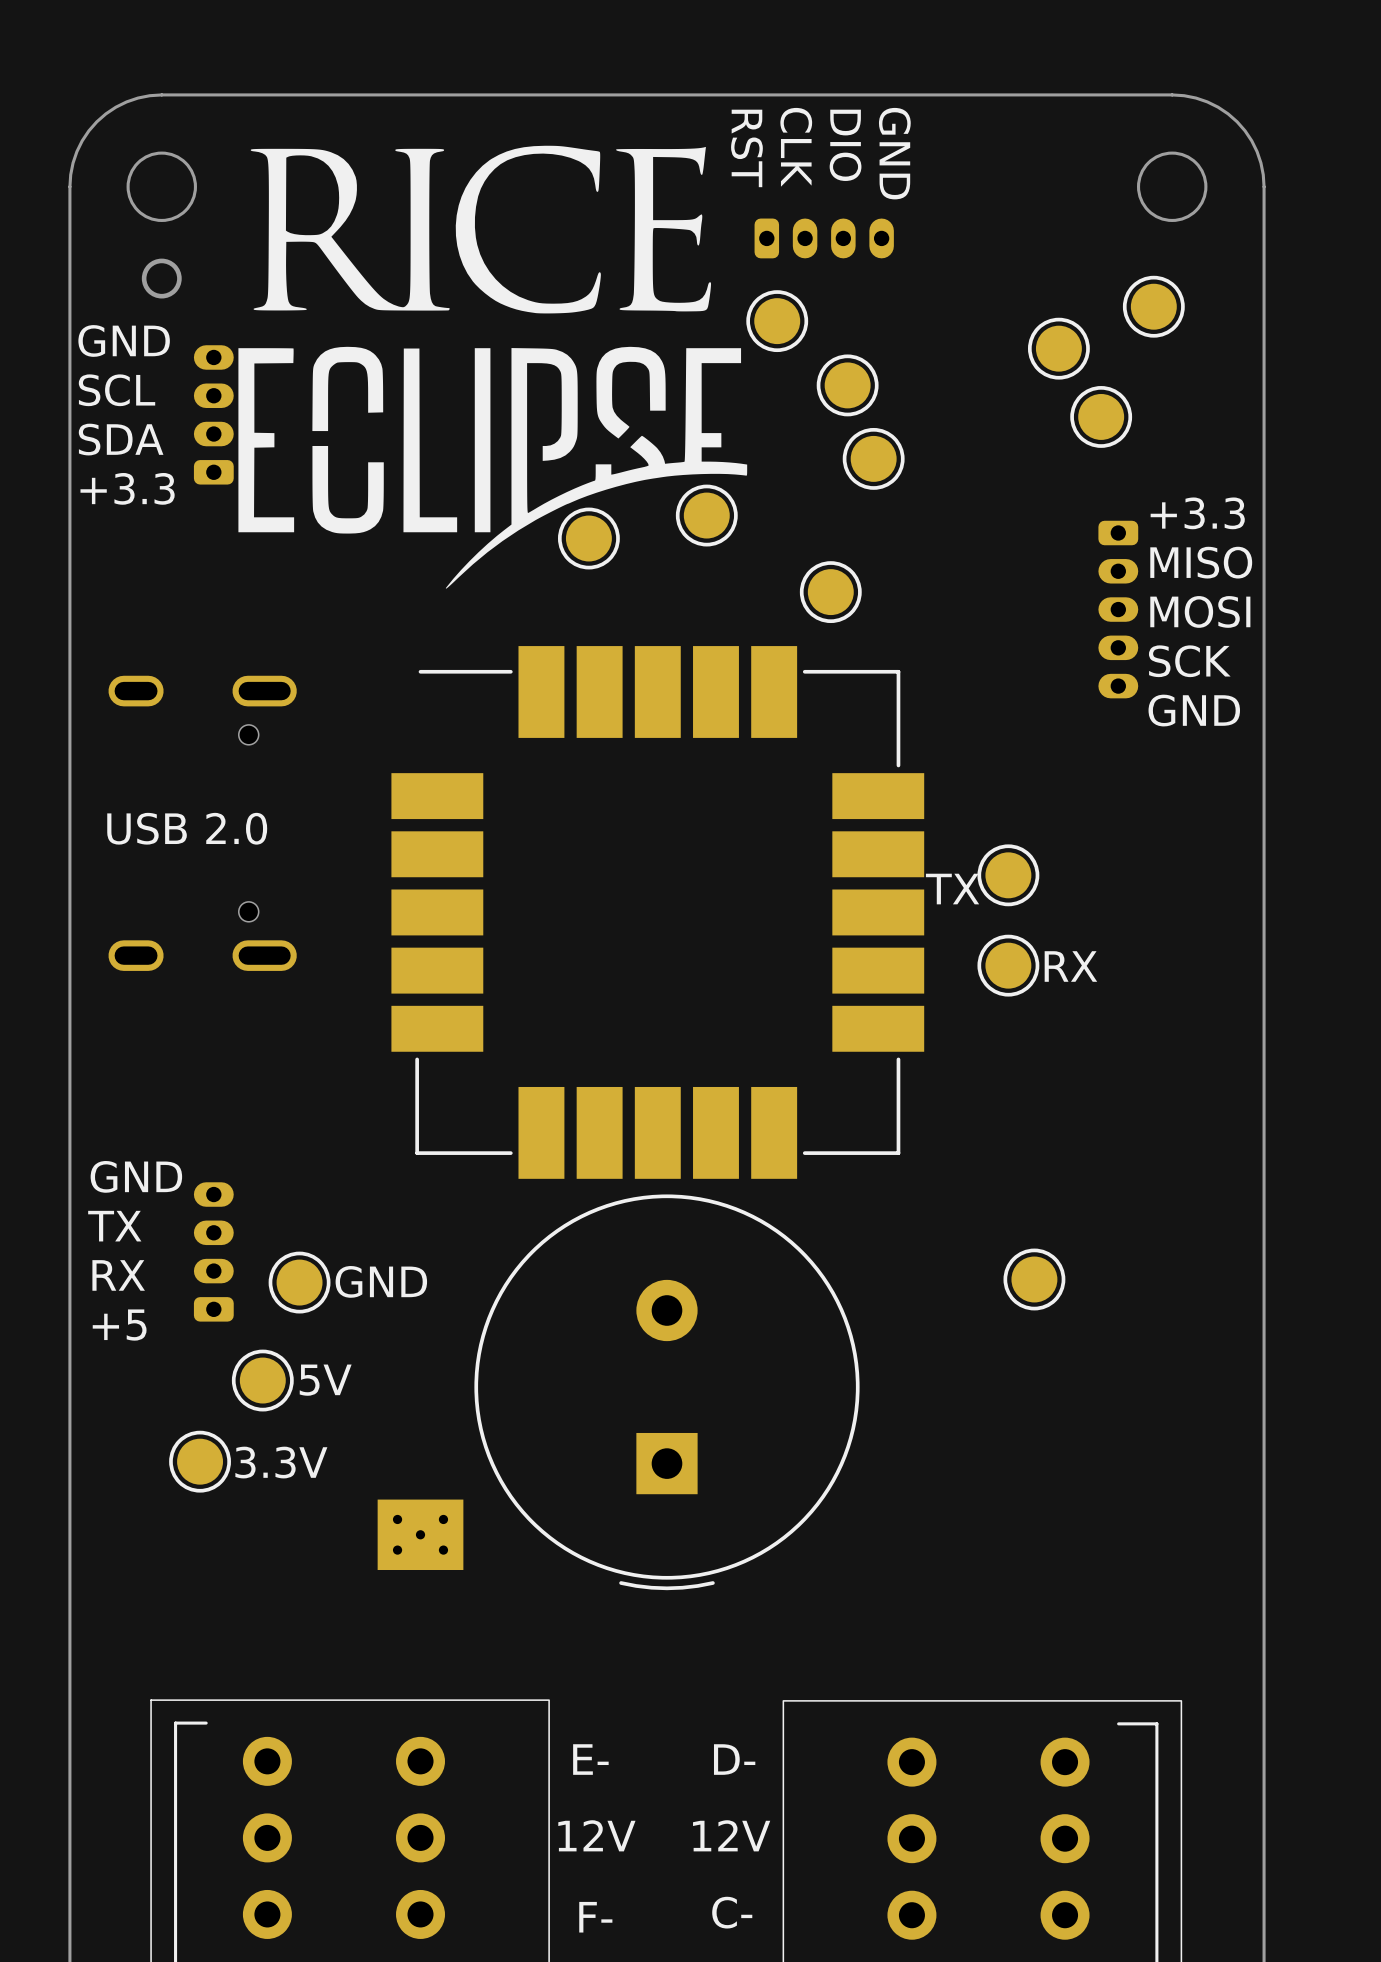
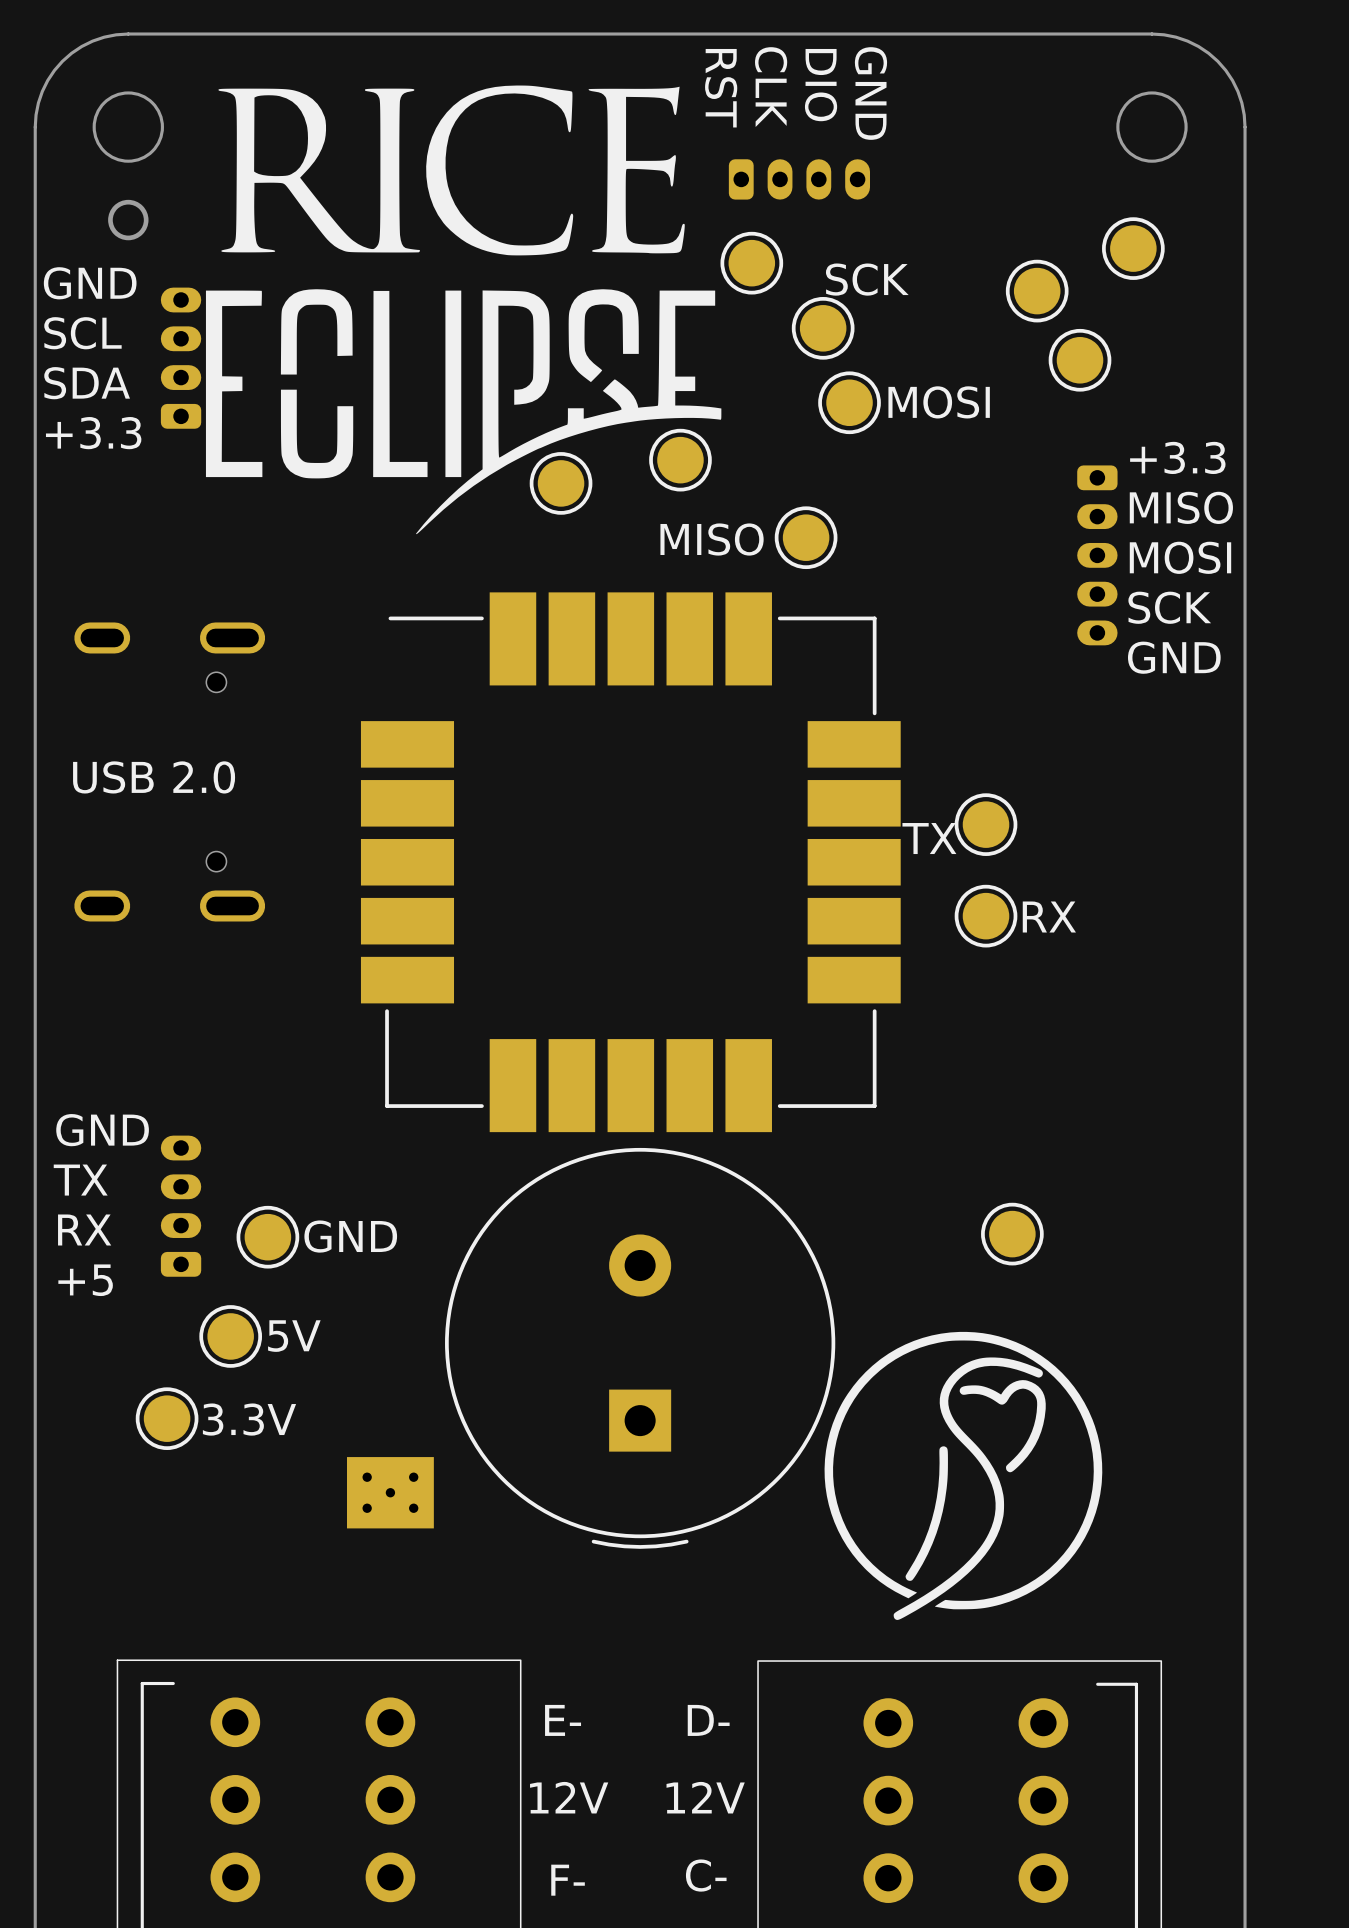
text: none -> SCK (867, 279)
text: none -> MOSI (939, 402)
text: none -> MISO (712, 539)
drawing: none -> [824, 1331, 1103, 1620]

